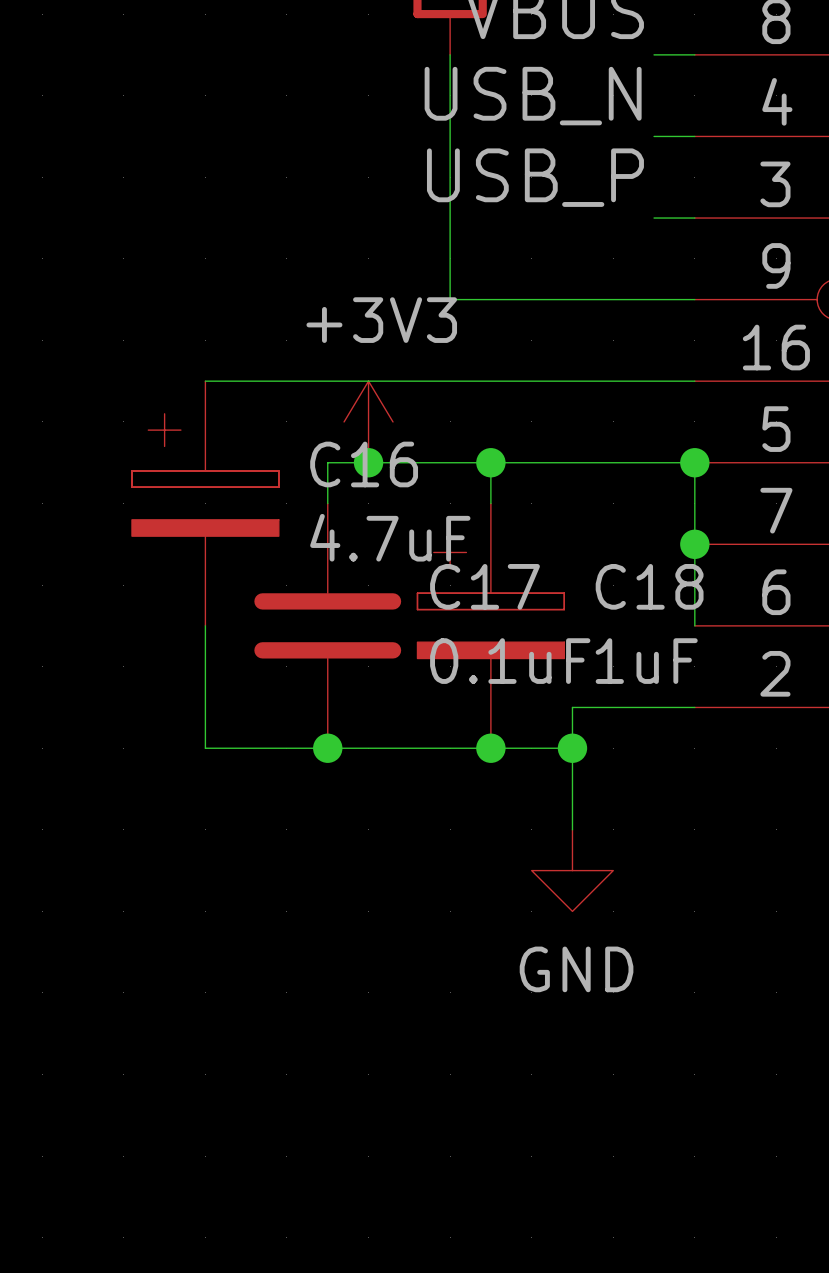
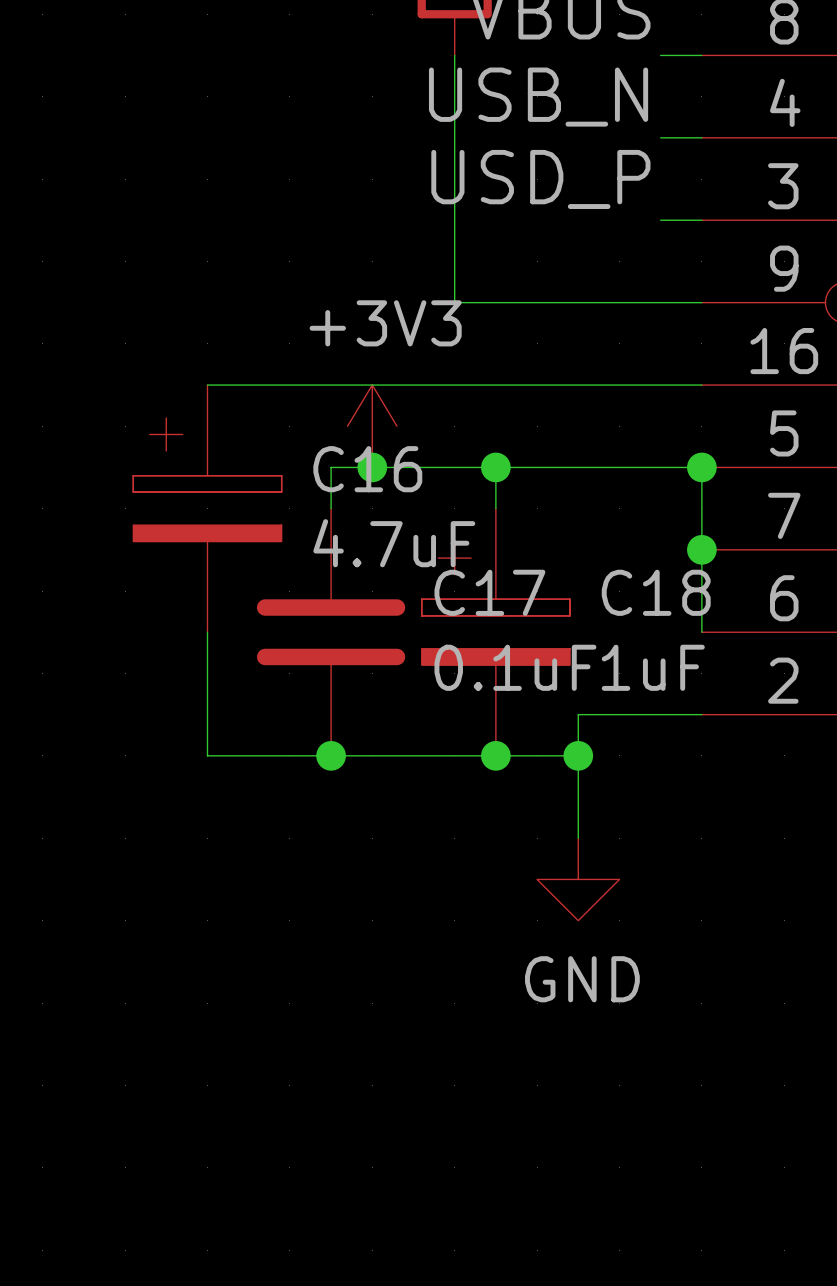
label: USB_P (535, 177) -> USD_P (540, 179)

